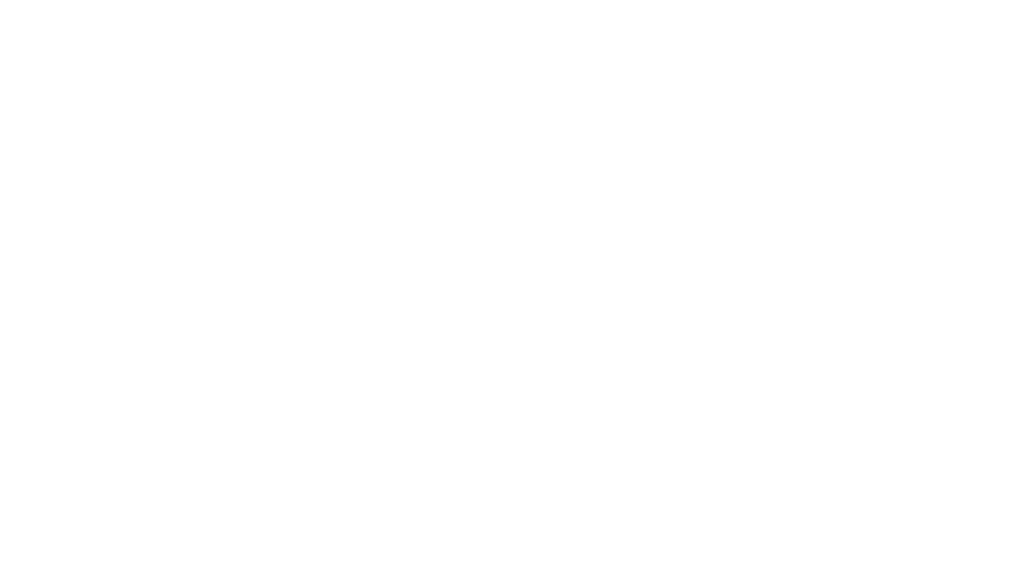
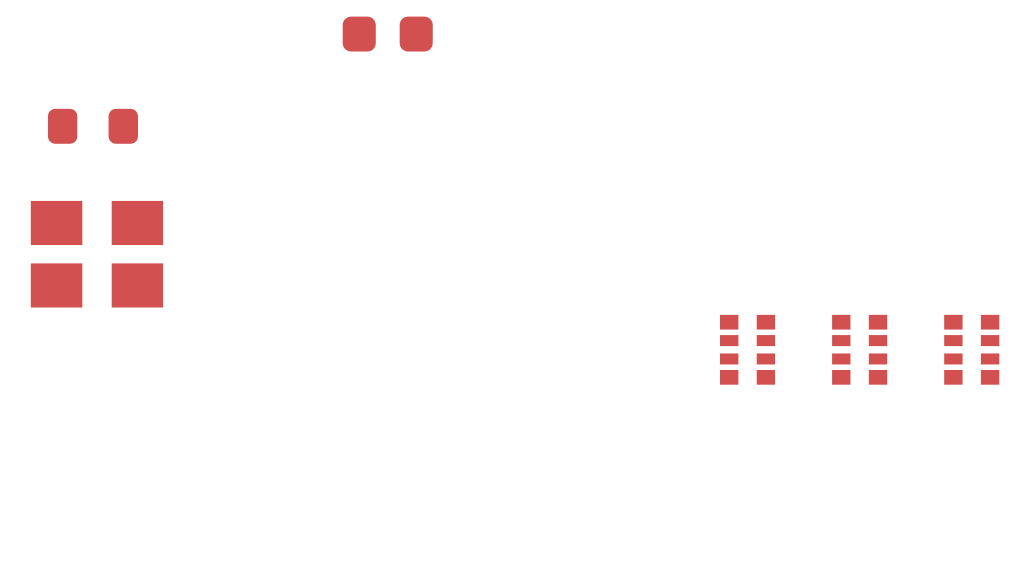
part: none -> (387, 34)
part: none -> (92, 126)
part: none -> (97, 254)
part: none -> (747, 349)
part: none -> (859, 349)
part: none -> (971, 349)

